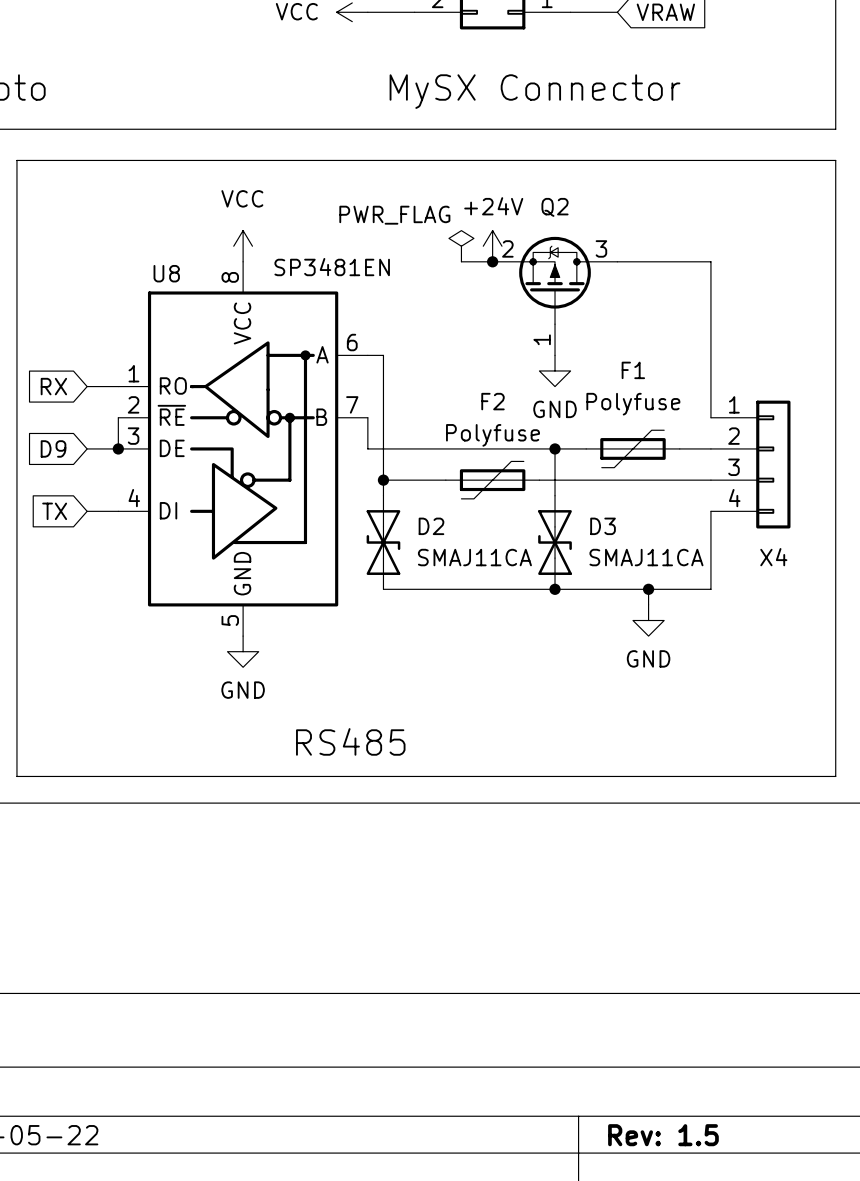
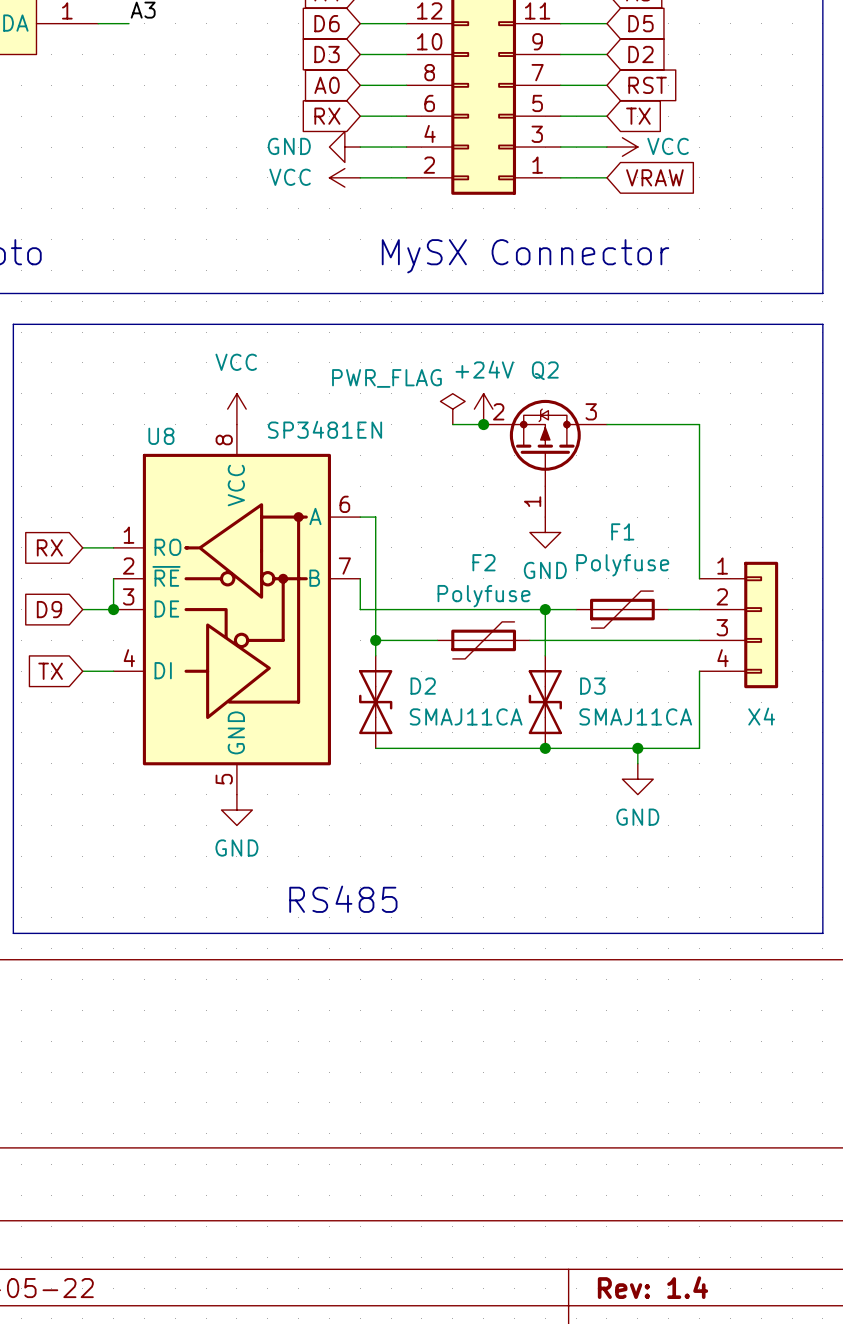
title block: Rev: 1.5 (663, 1135) -> Rev: 1.4 (652, 1287)

